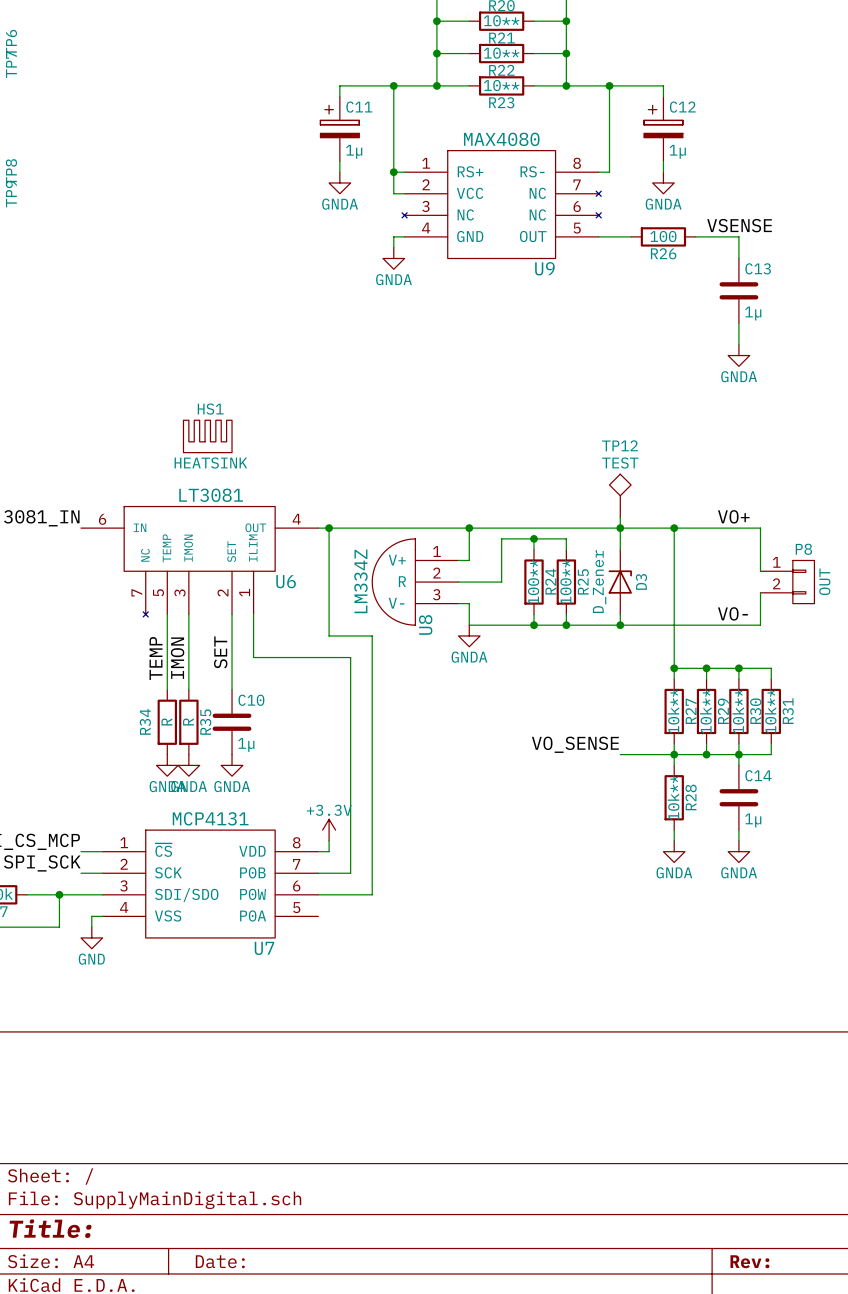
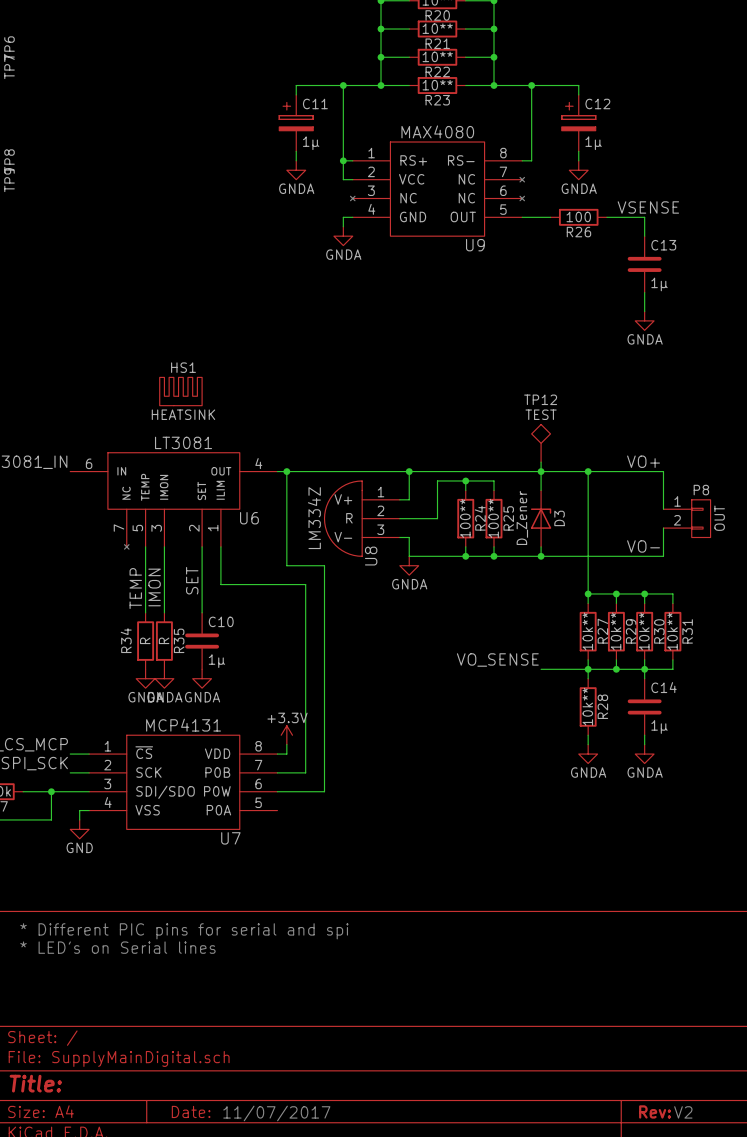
text: none -> * Different PIC pins for serial and spi (184, 931)
text: none -> * LED's on Serial lines (117, 947)
text: none -> 11/07/2017 (276, 1113)
text: none -> V2 (683, 1112)

